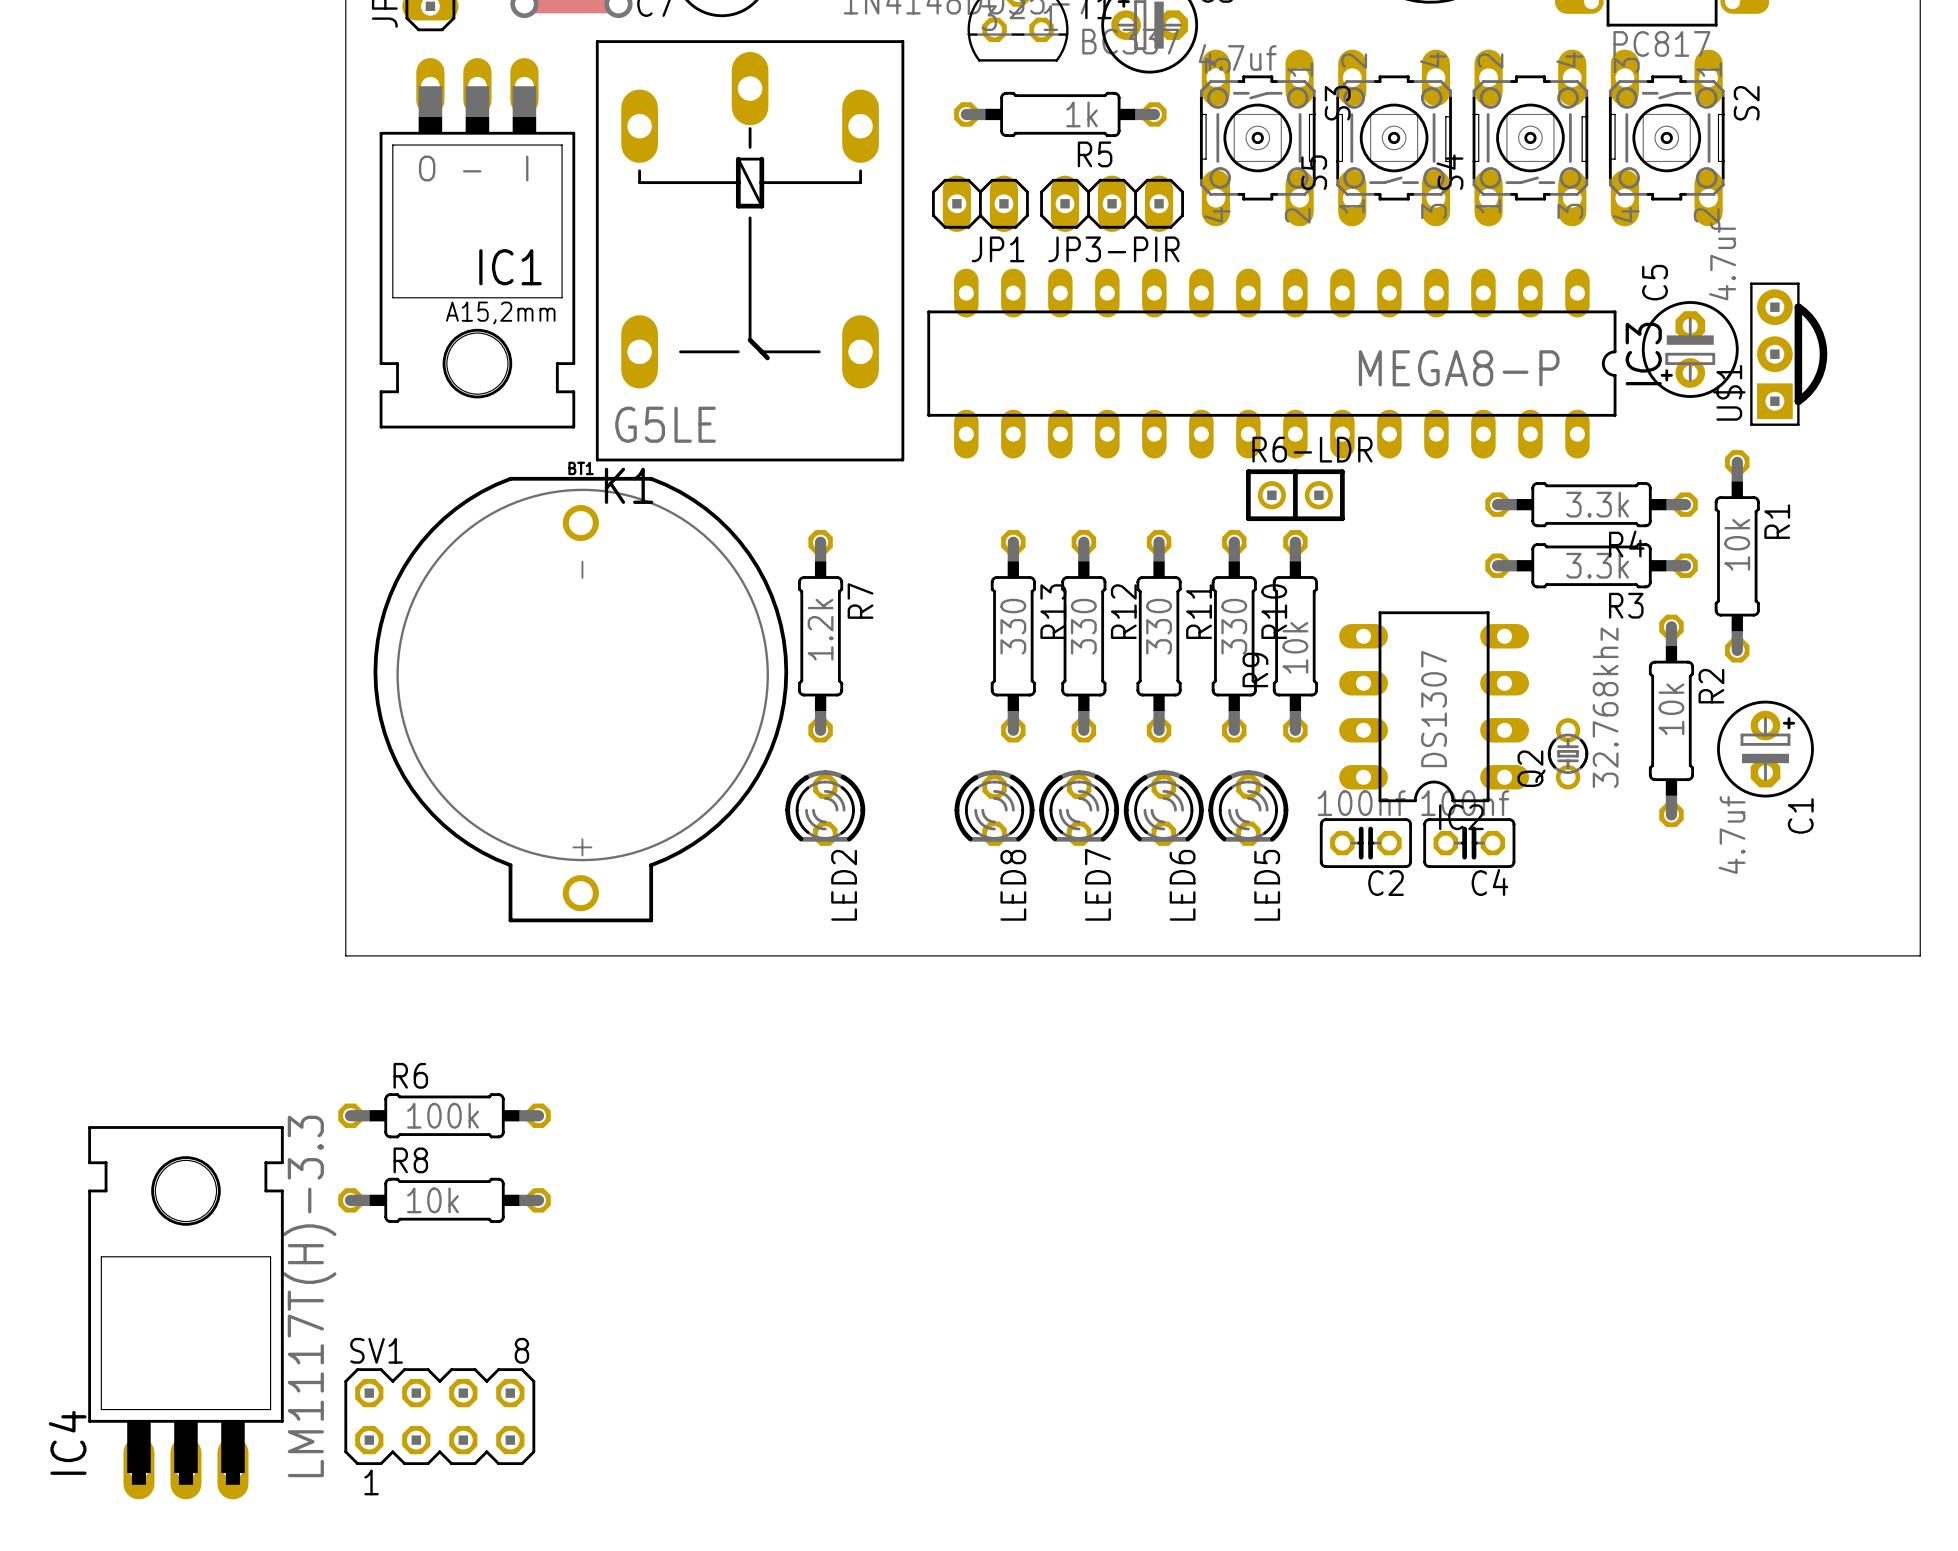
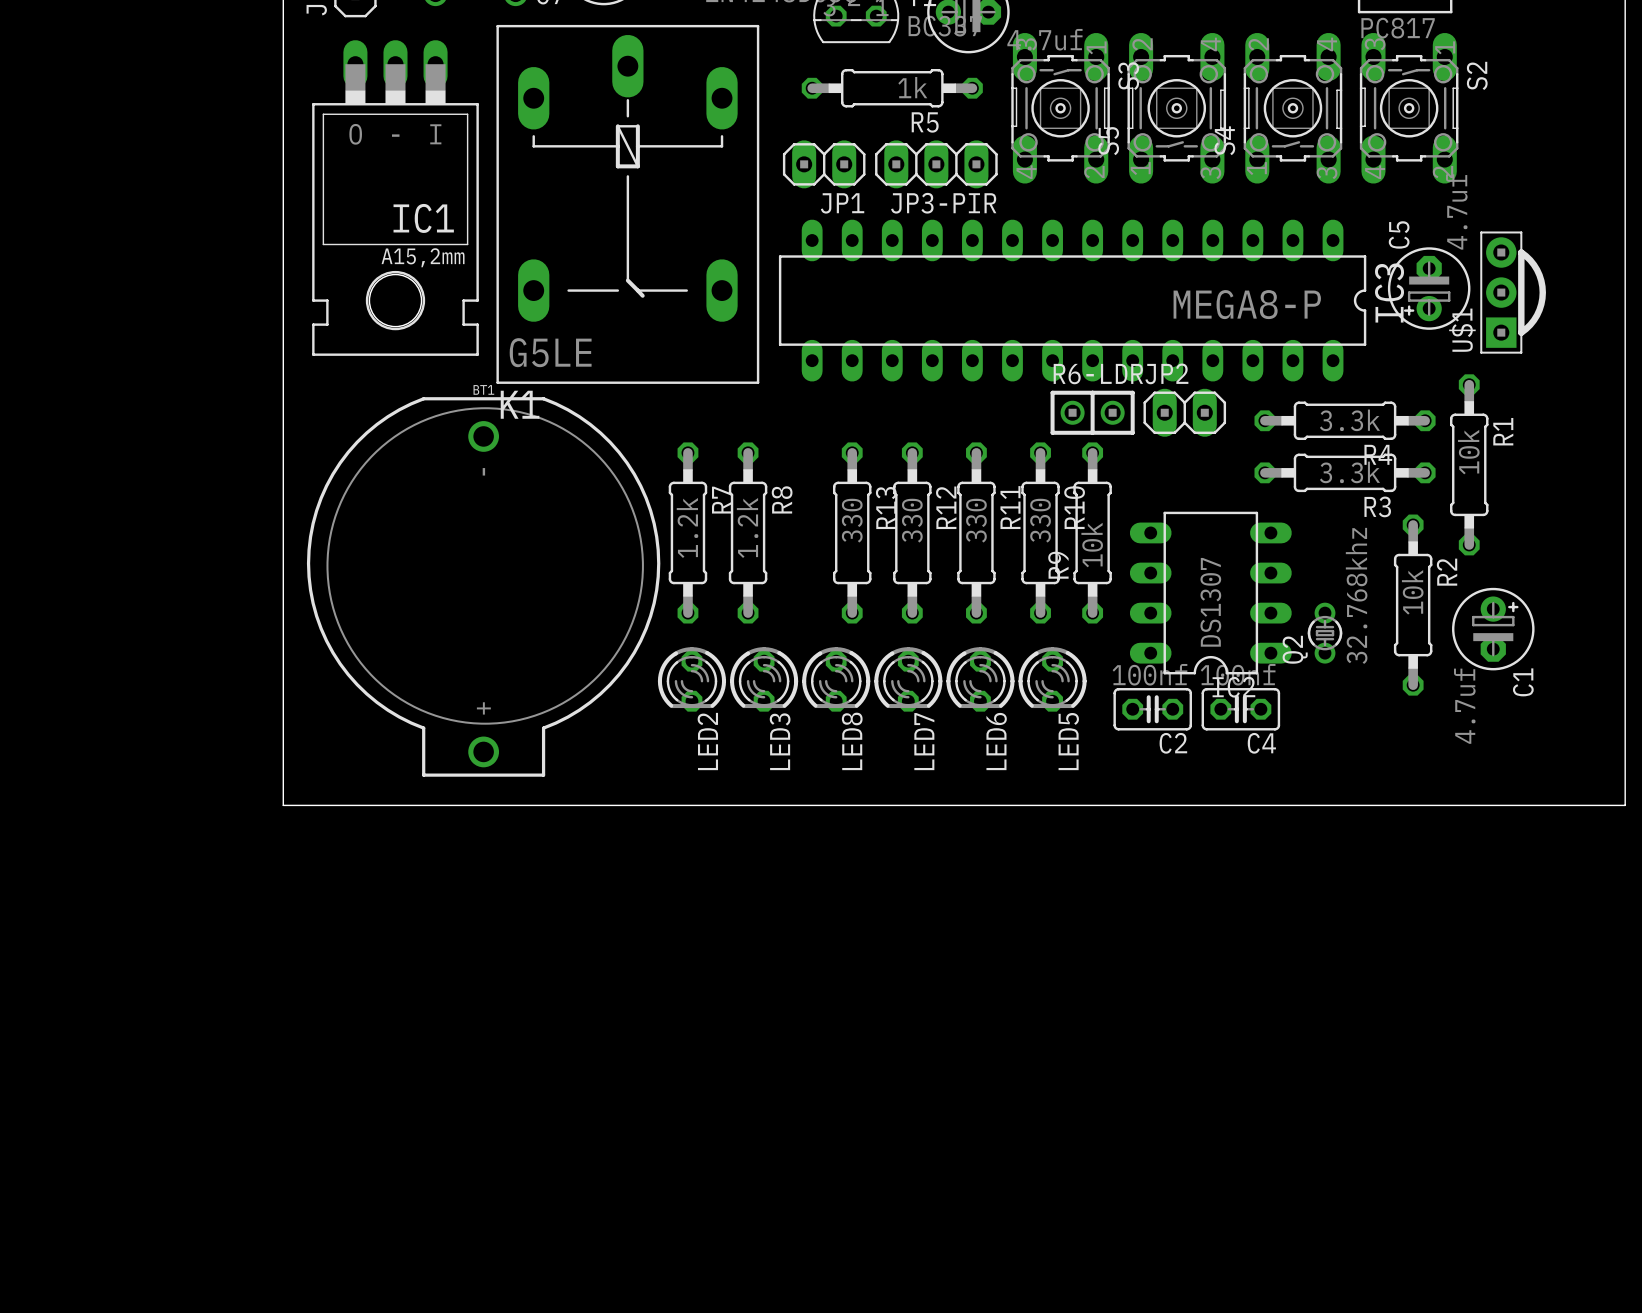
JP2: none -> (1184, 412)
LED3: none -> (764, 679)
R6: 100k (444, 1115) -> none
R8 value: 10k (432, 1200) -> 1.2k (747, 527)
R8 rotation: 0° (444, 1200) -> 90° clockwise (748, 532)
R8 position: (444, 1200) -> (748, 532)
IC4: LM1117T(H)-3.3 (185, 1312) -> none
SV1: (439, 1416) -> none

